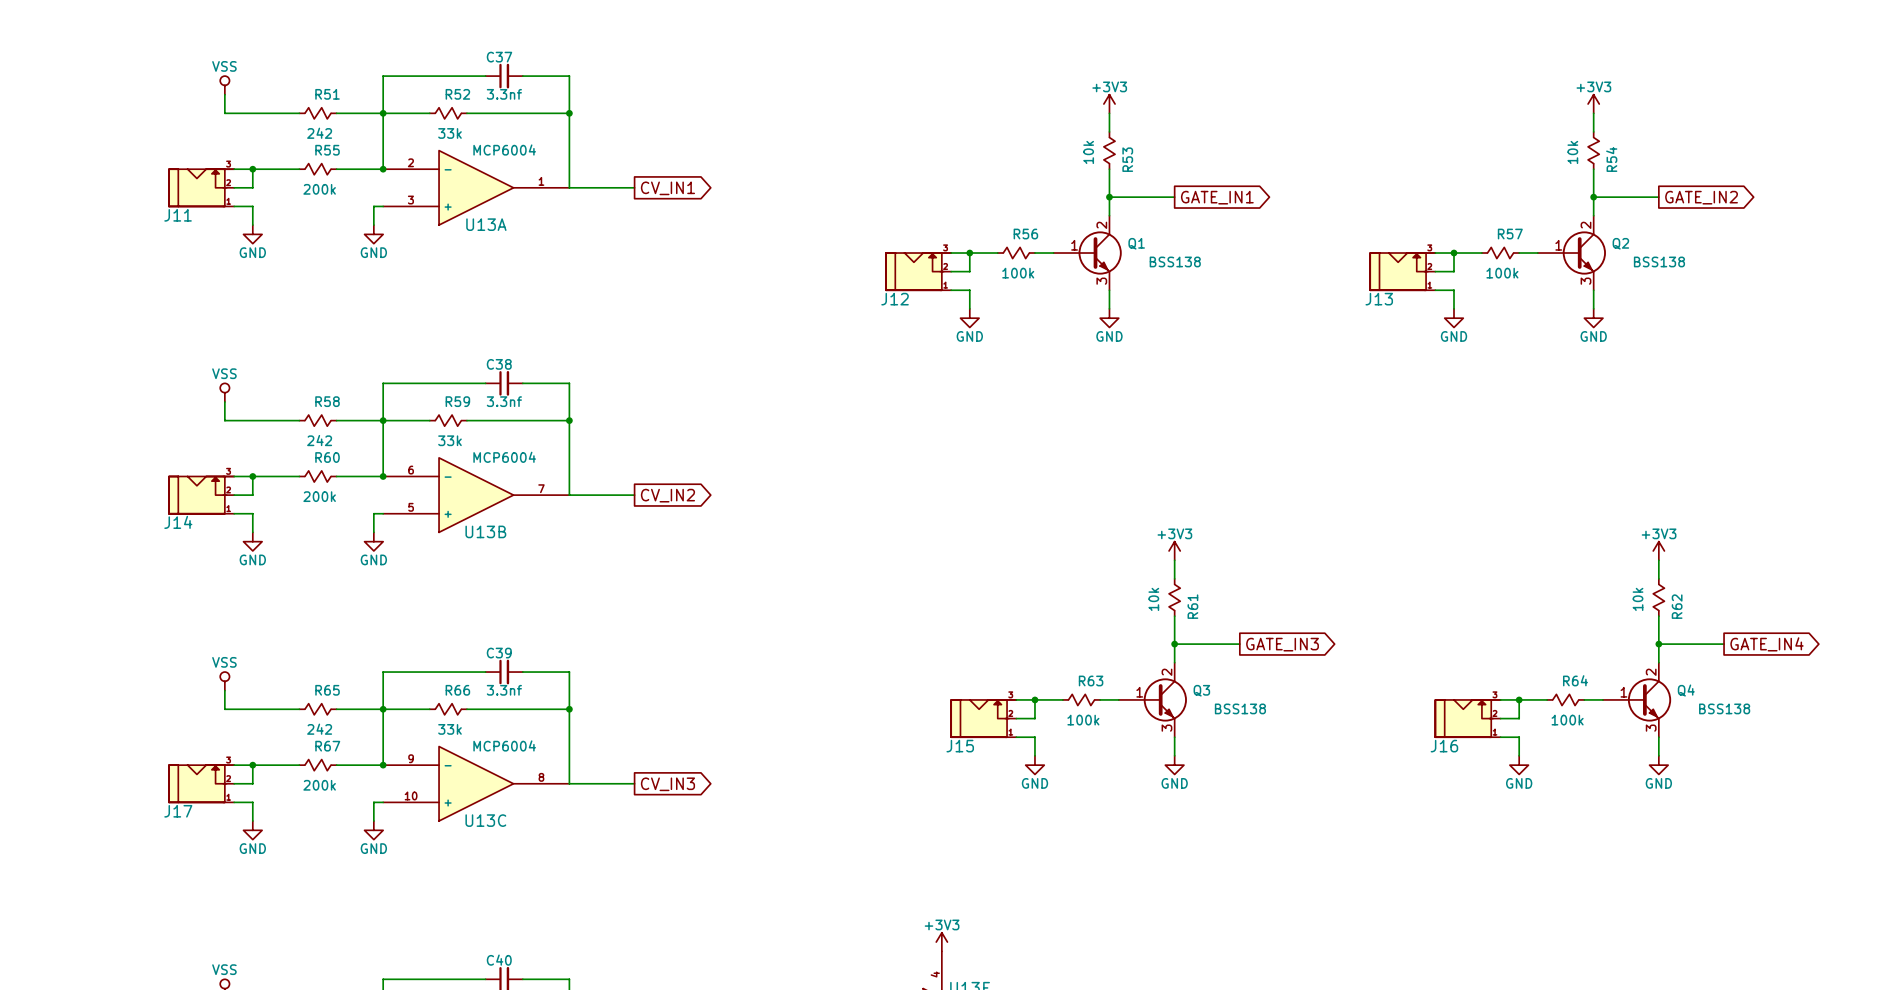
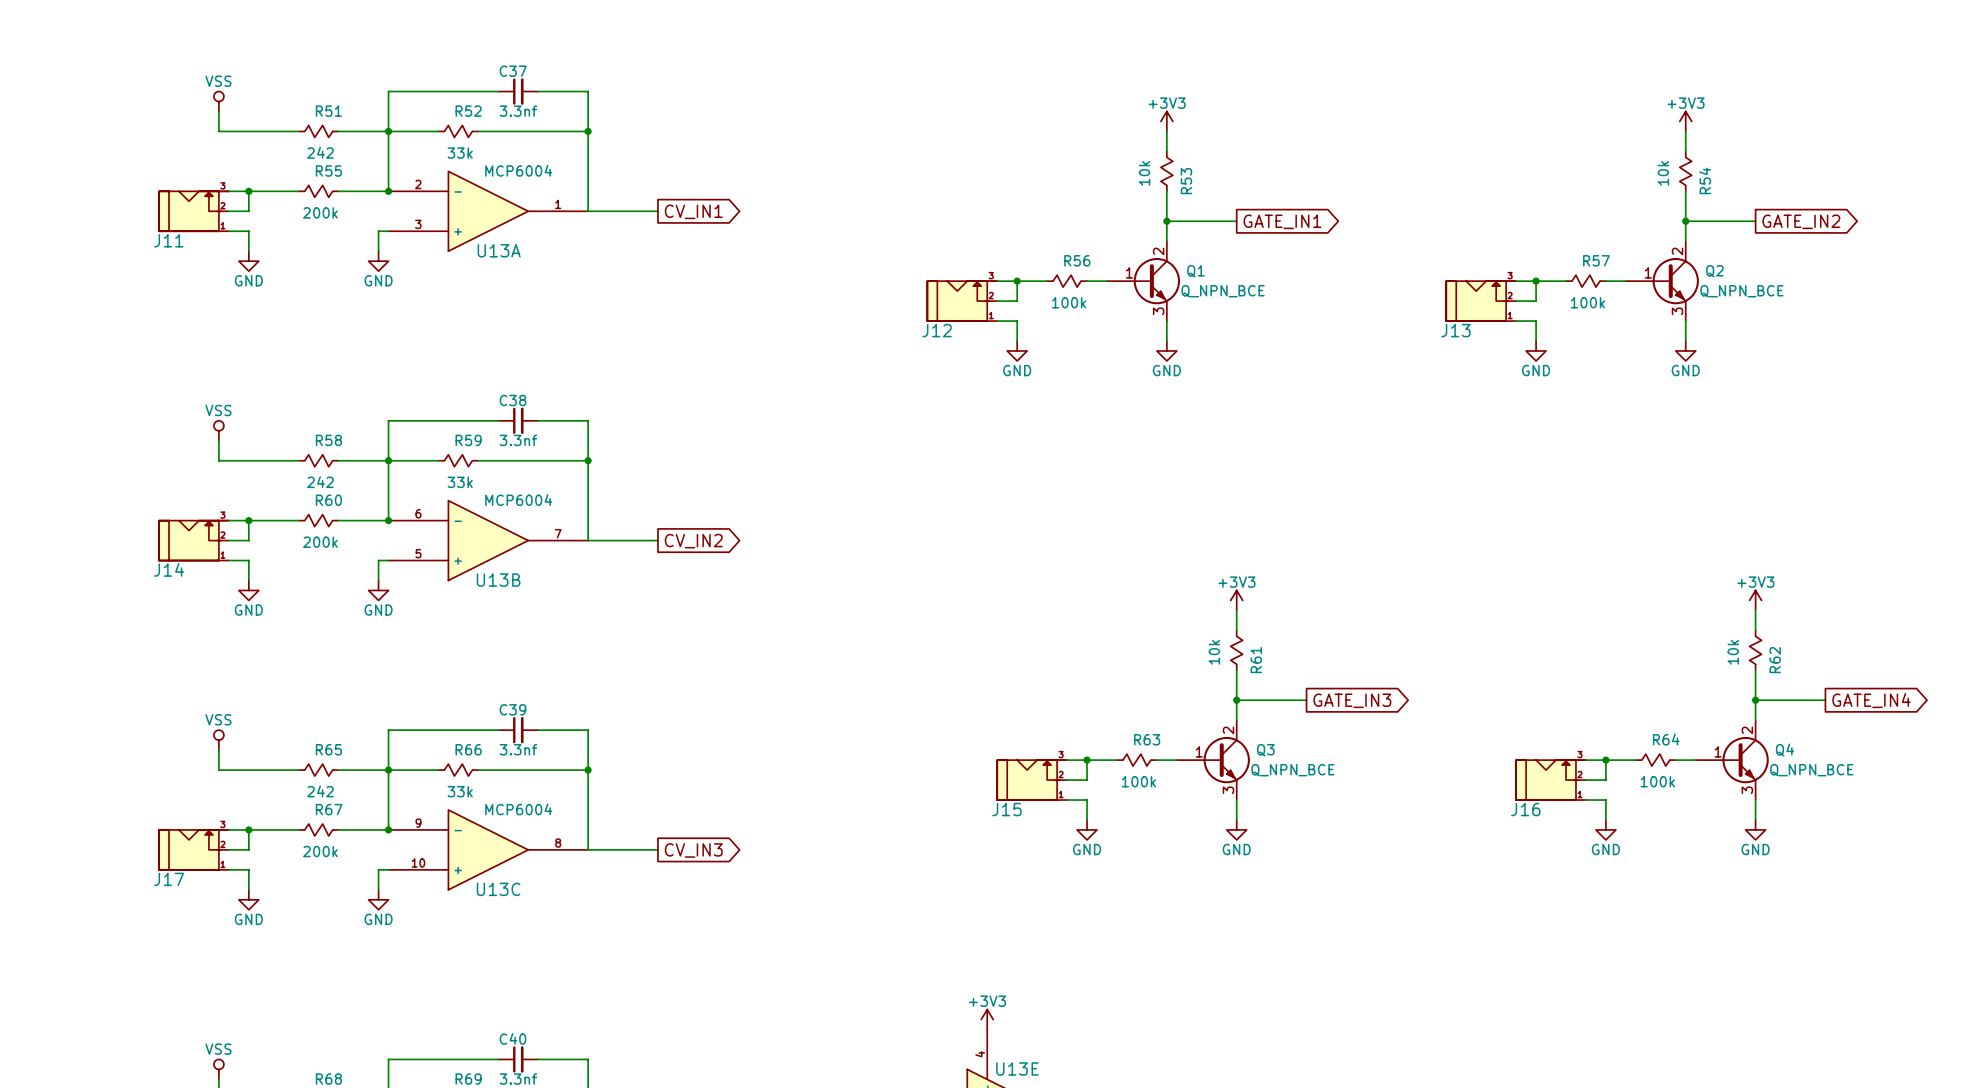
Q1 value: BSS138 (1175, 261) -> Q_NPN_BCE (1223, 291)
Q2 value: BSS138 (1659, 261) -> Q_NPN_BCE (1741, 291)
Q3 value: BSS138 (1240, 708) -> Q_NPN_BCE (1292, 770)
Q4 value: BSS138 (1724, 708) -> Q_NPN_BCE (1811, 770)

